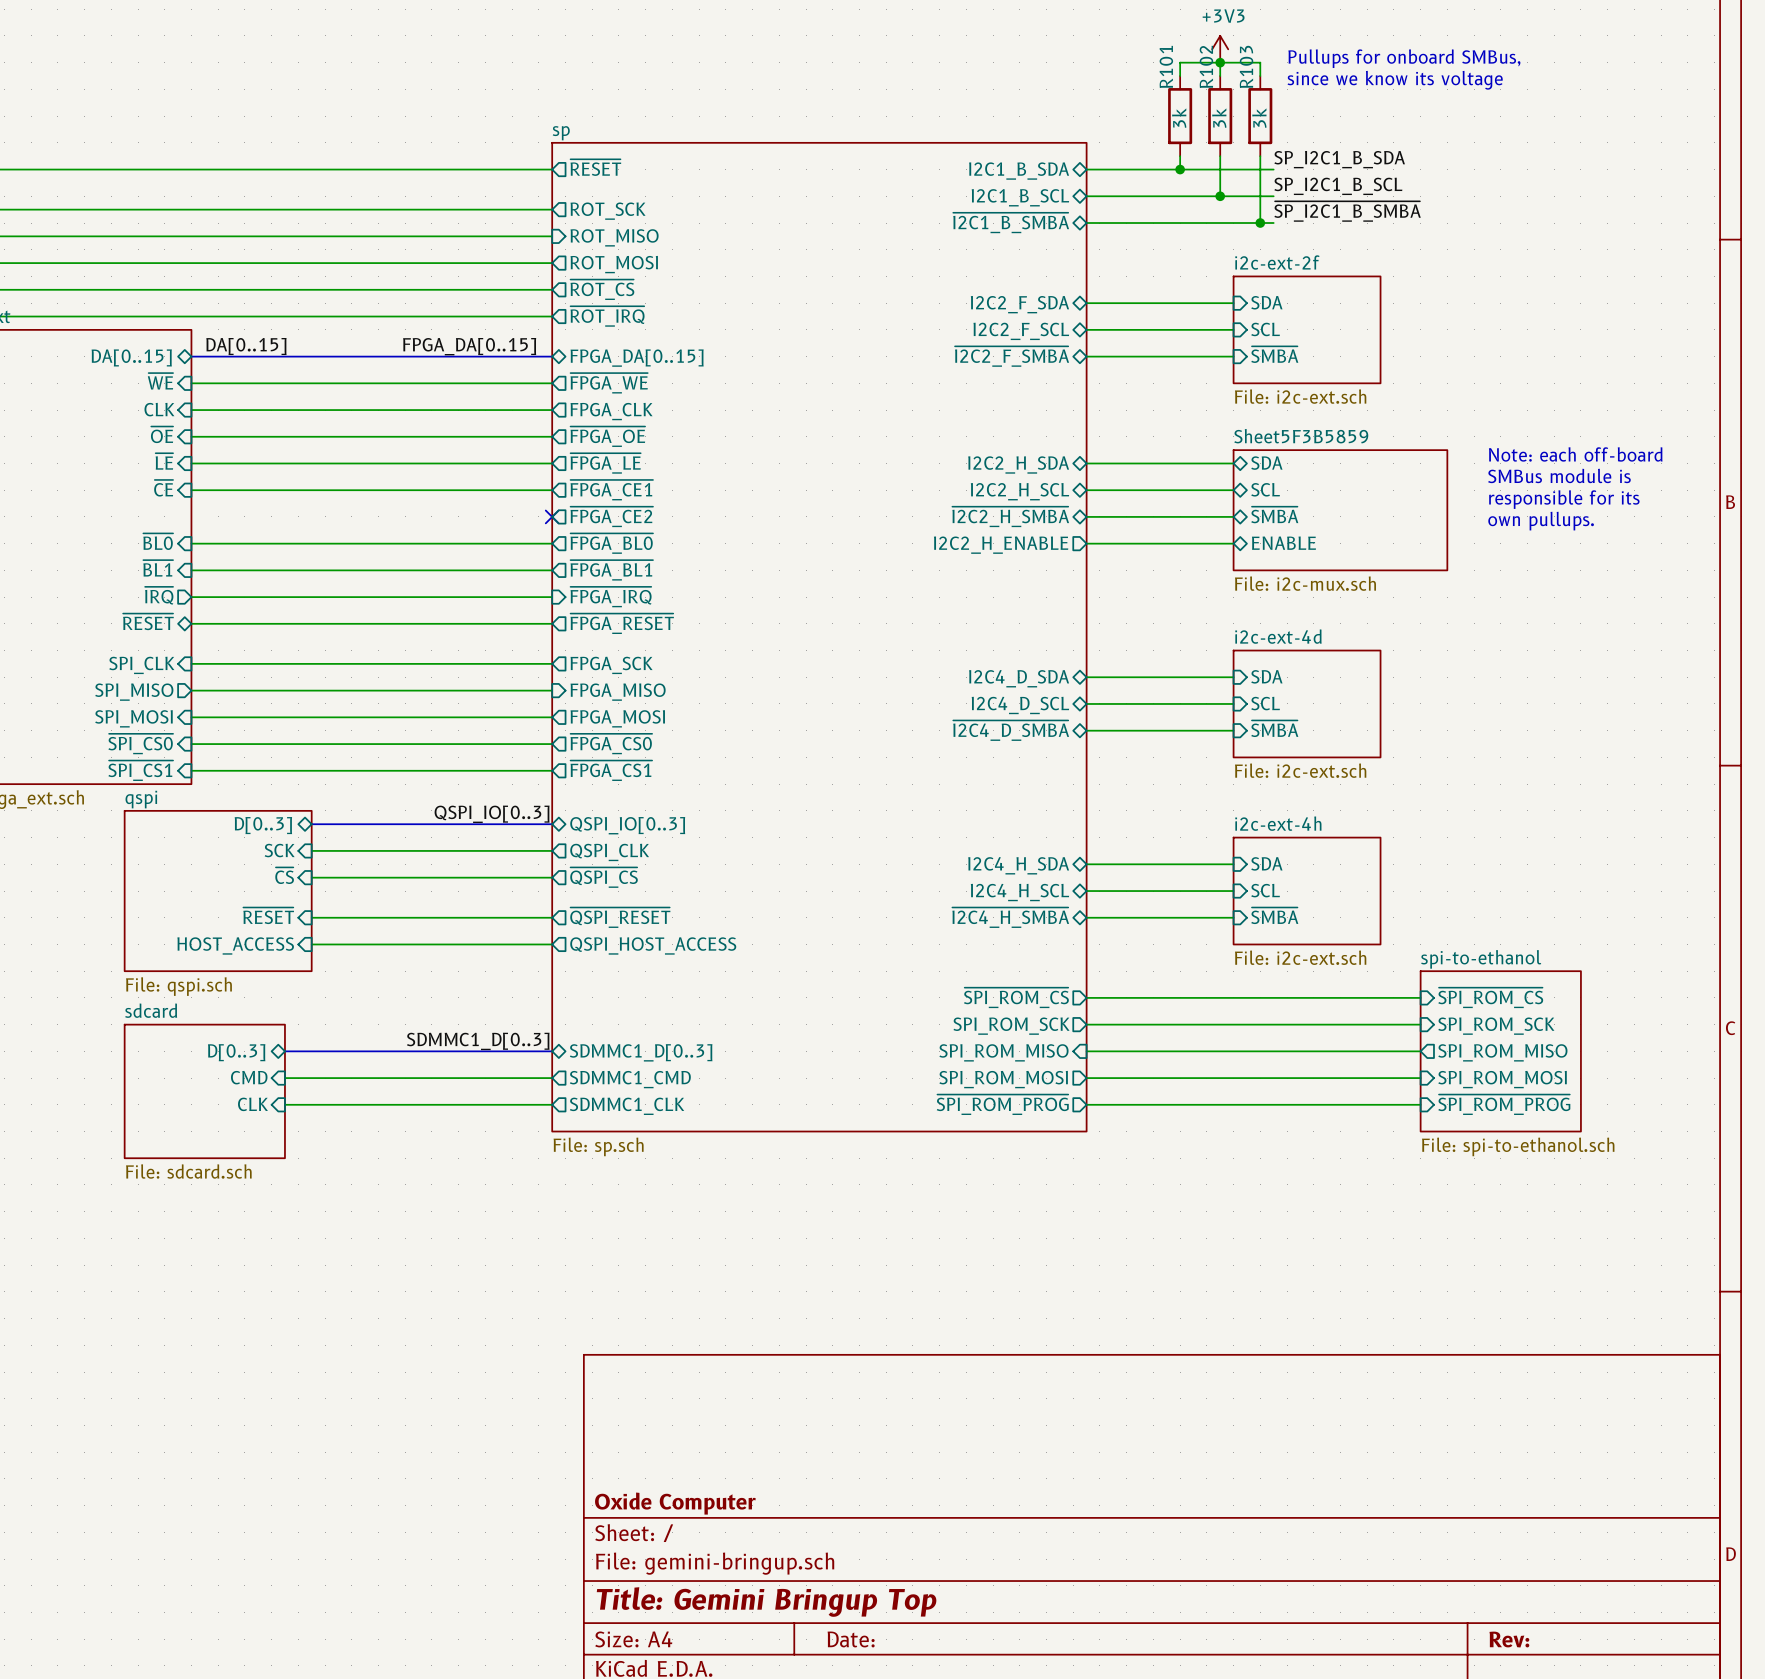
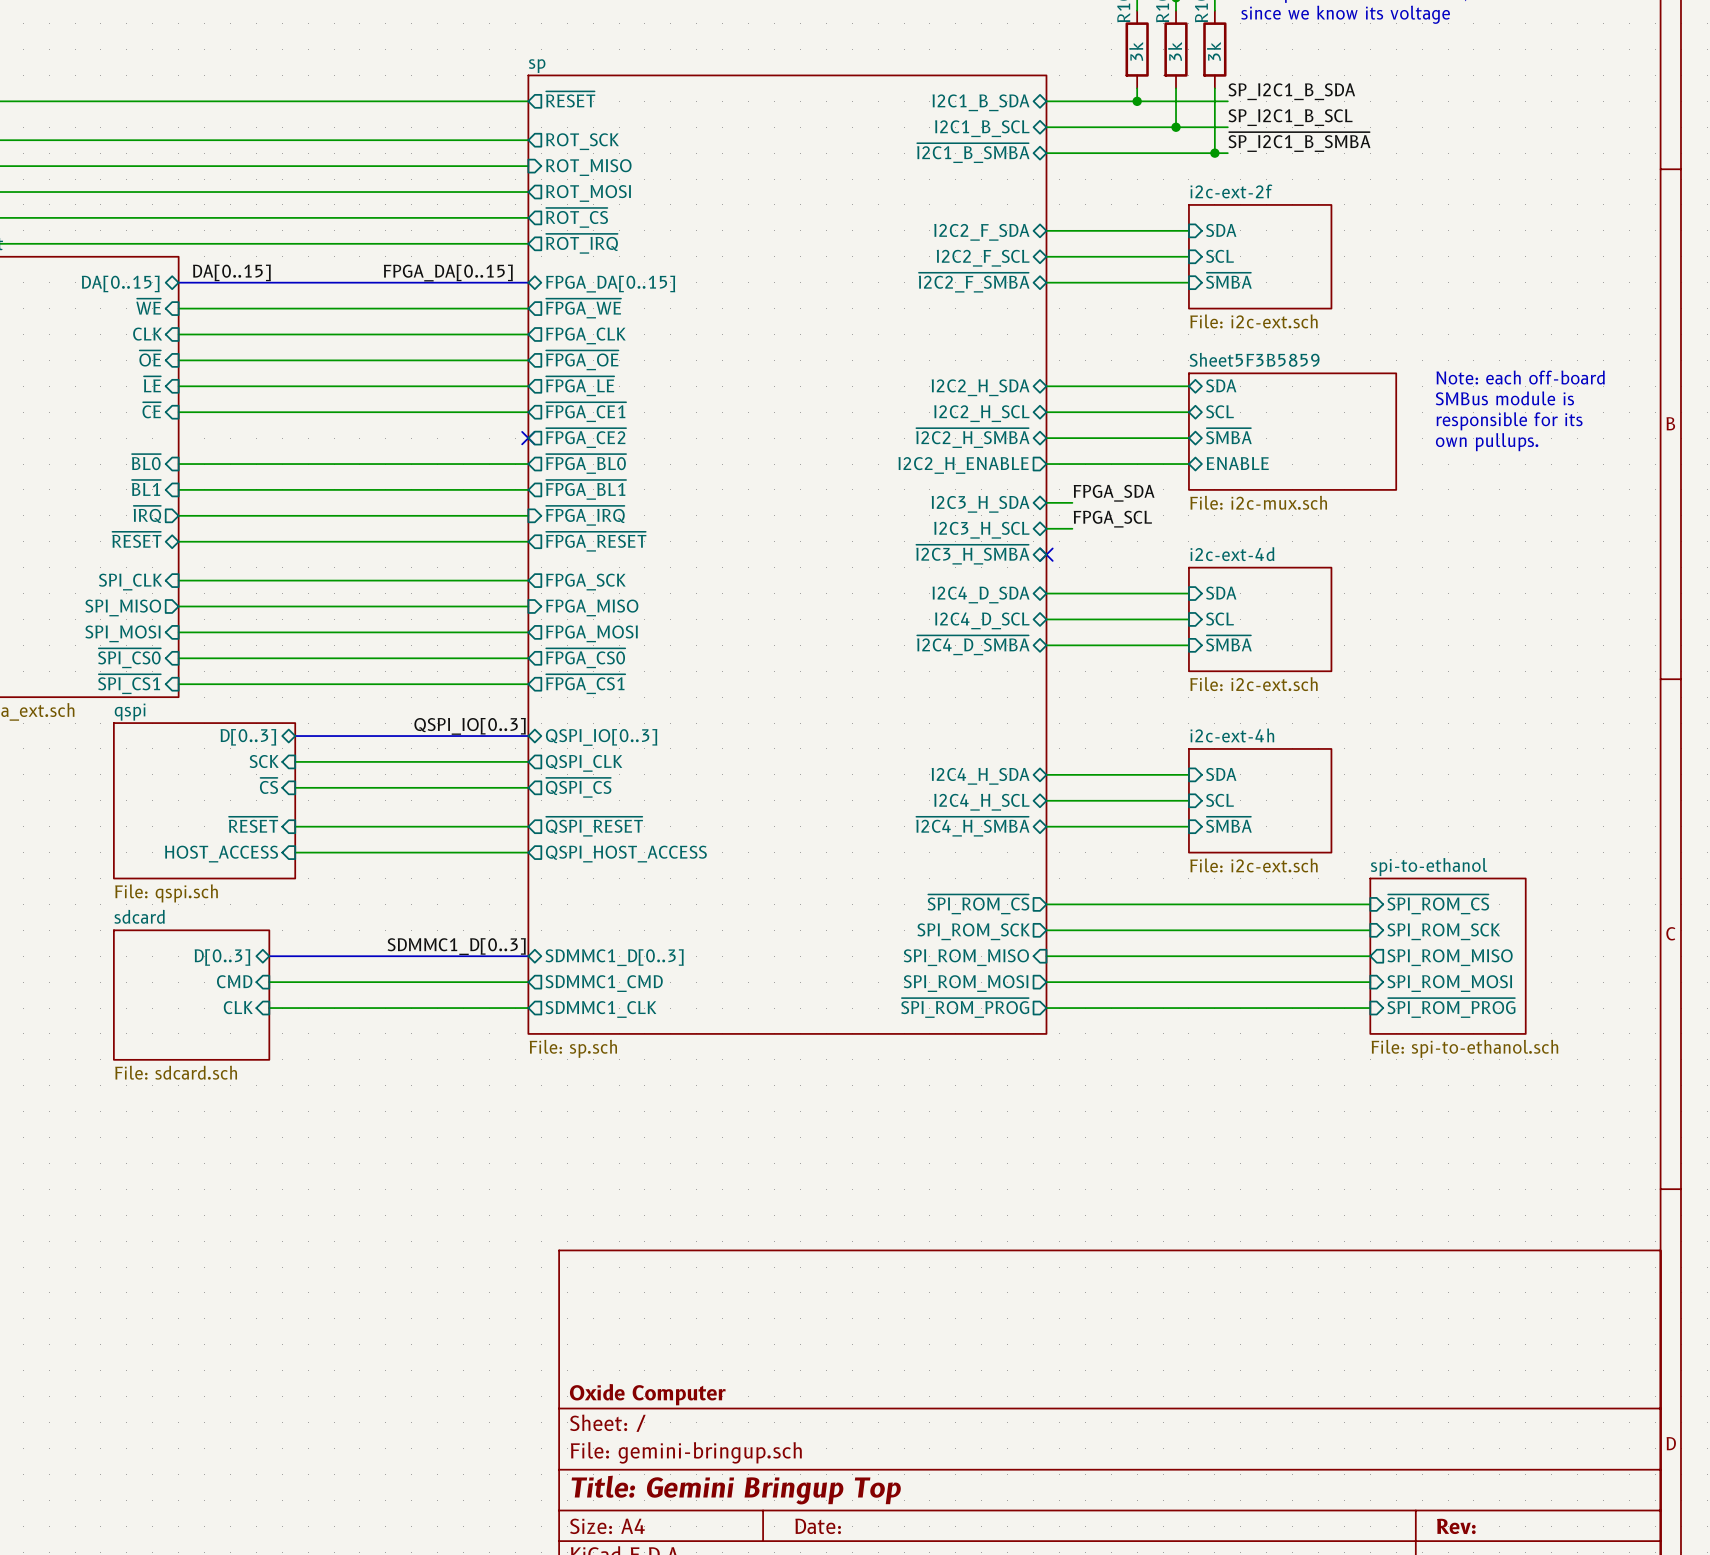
label: none -> FPGA_SDA (1114, 493)
wire: none -> (1046, 502) (1072, 502)
sheet pin: none -> I2C3_H_SDA (980, 504)
label: none -> FPGA_SCL (1112, 519)
wire: none -> (1046, 528) (1072, 528)
sheet pin: none -> I2C3_H_SCL (981, 530)
sheet pin: none -> ~{I2C3_H_SMBA} (972, 554)
no-connect mark: none -> (1046, 554)

